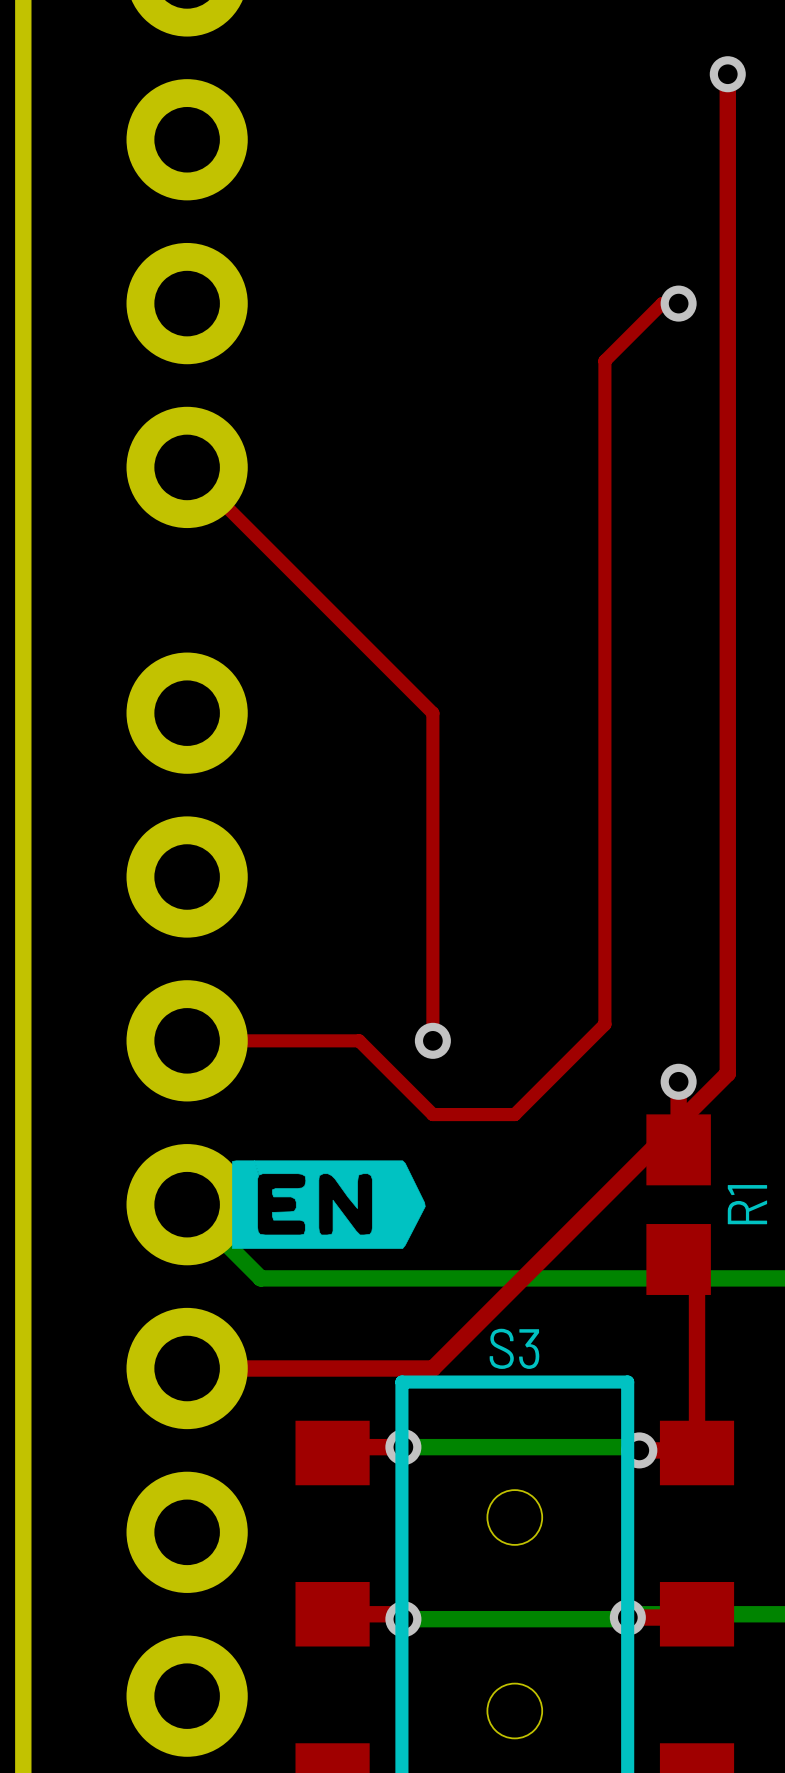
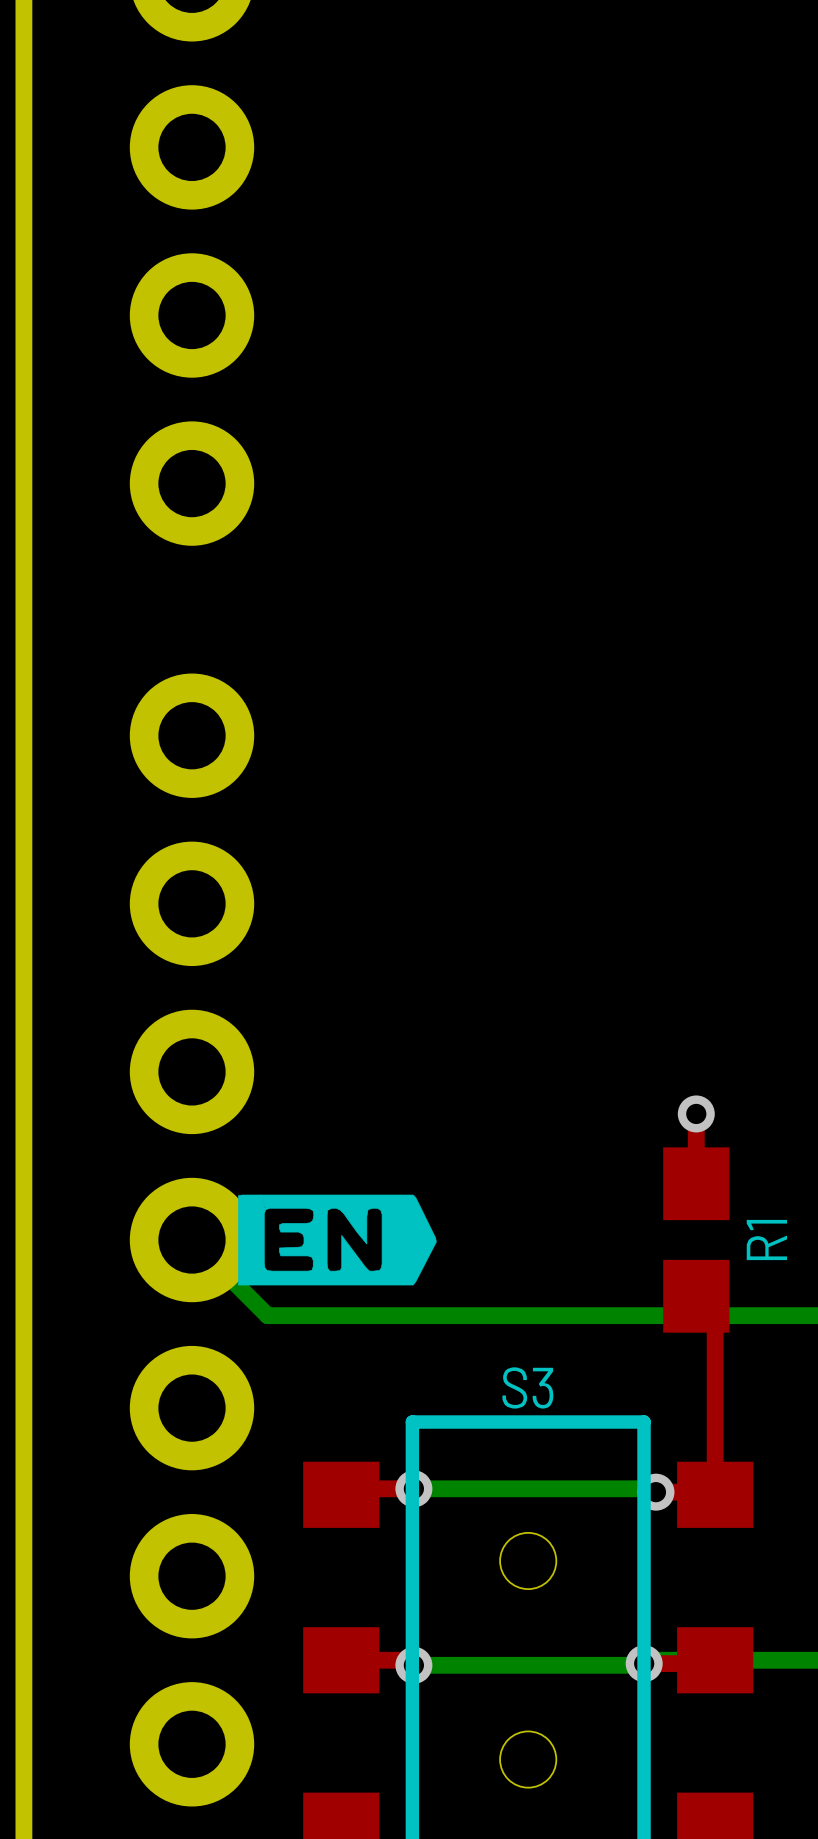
top track: (727, 74) (727, 1073) (432, 1368) (187, 1368) -> none
via: (727, 74) -> none
top track: (678, 303) (662, 303) (604, 360) (604, 1024) (514, 1114) (432, 1114) (359, 1040) (187, 1040) -> none
via: (678, 303) -> none
top track: (187, 467) (432, 713) (432, 1040) -> none
via: (432, 1040) -> none

